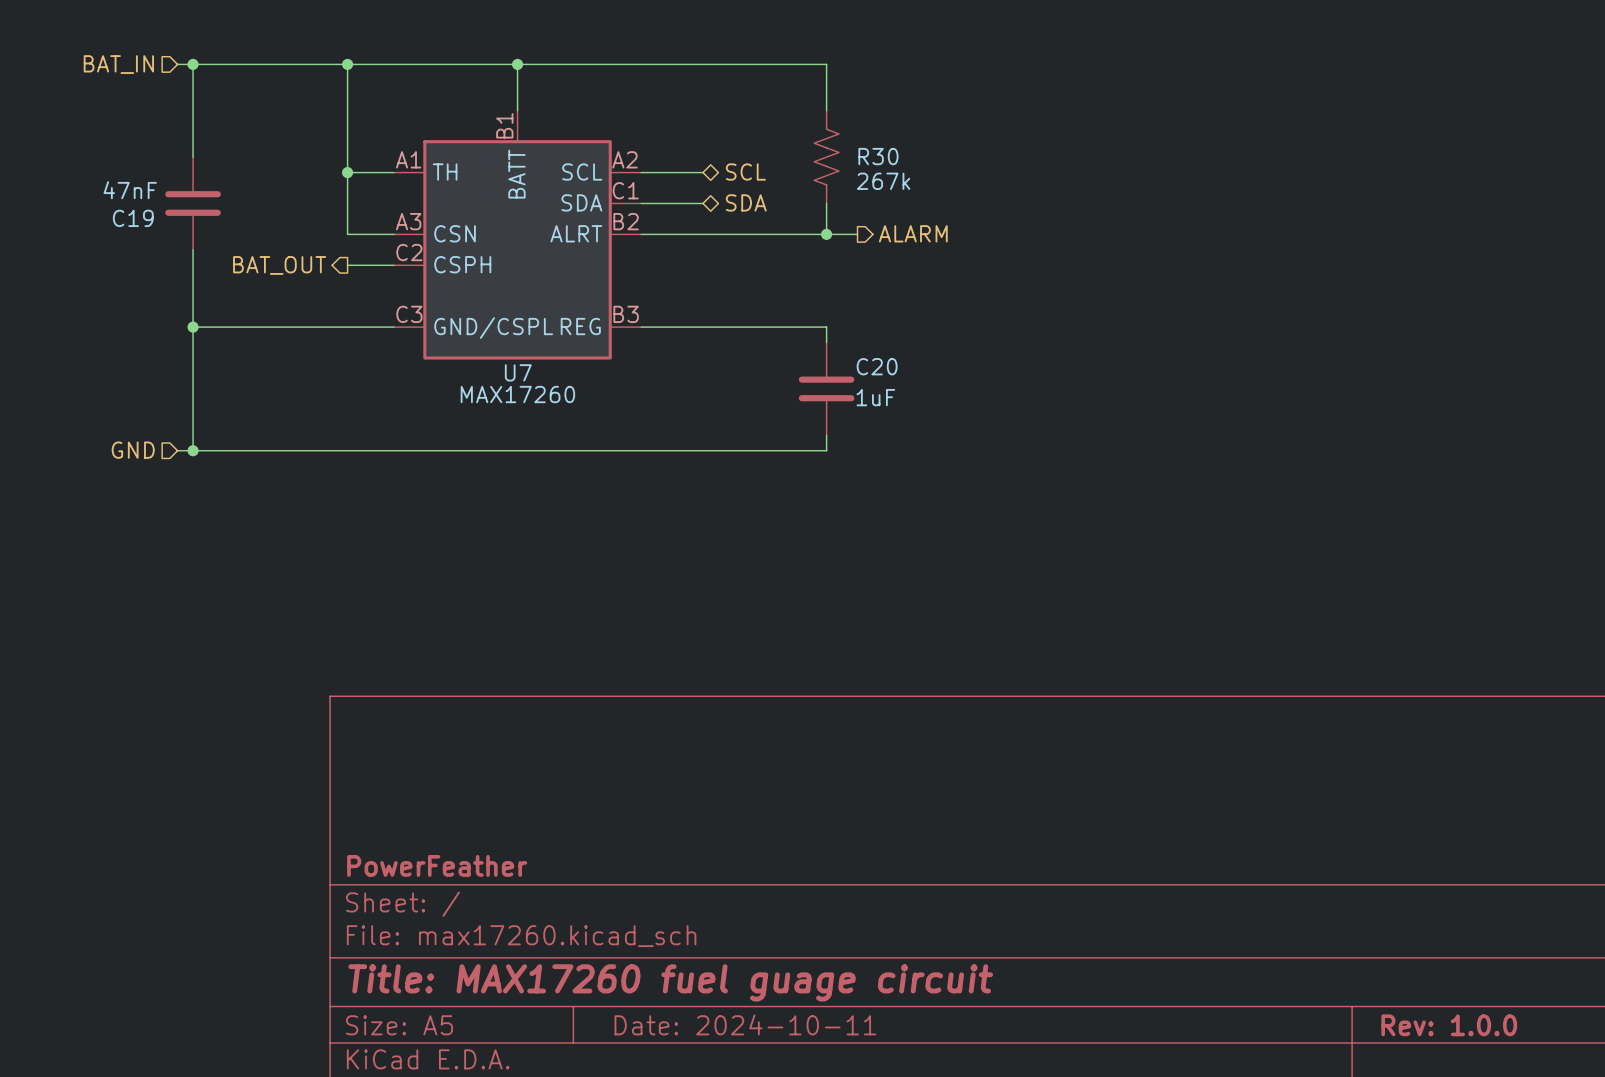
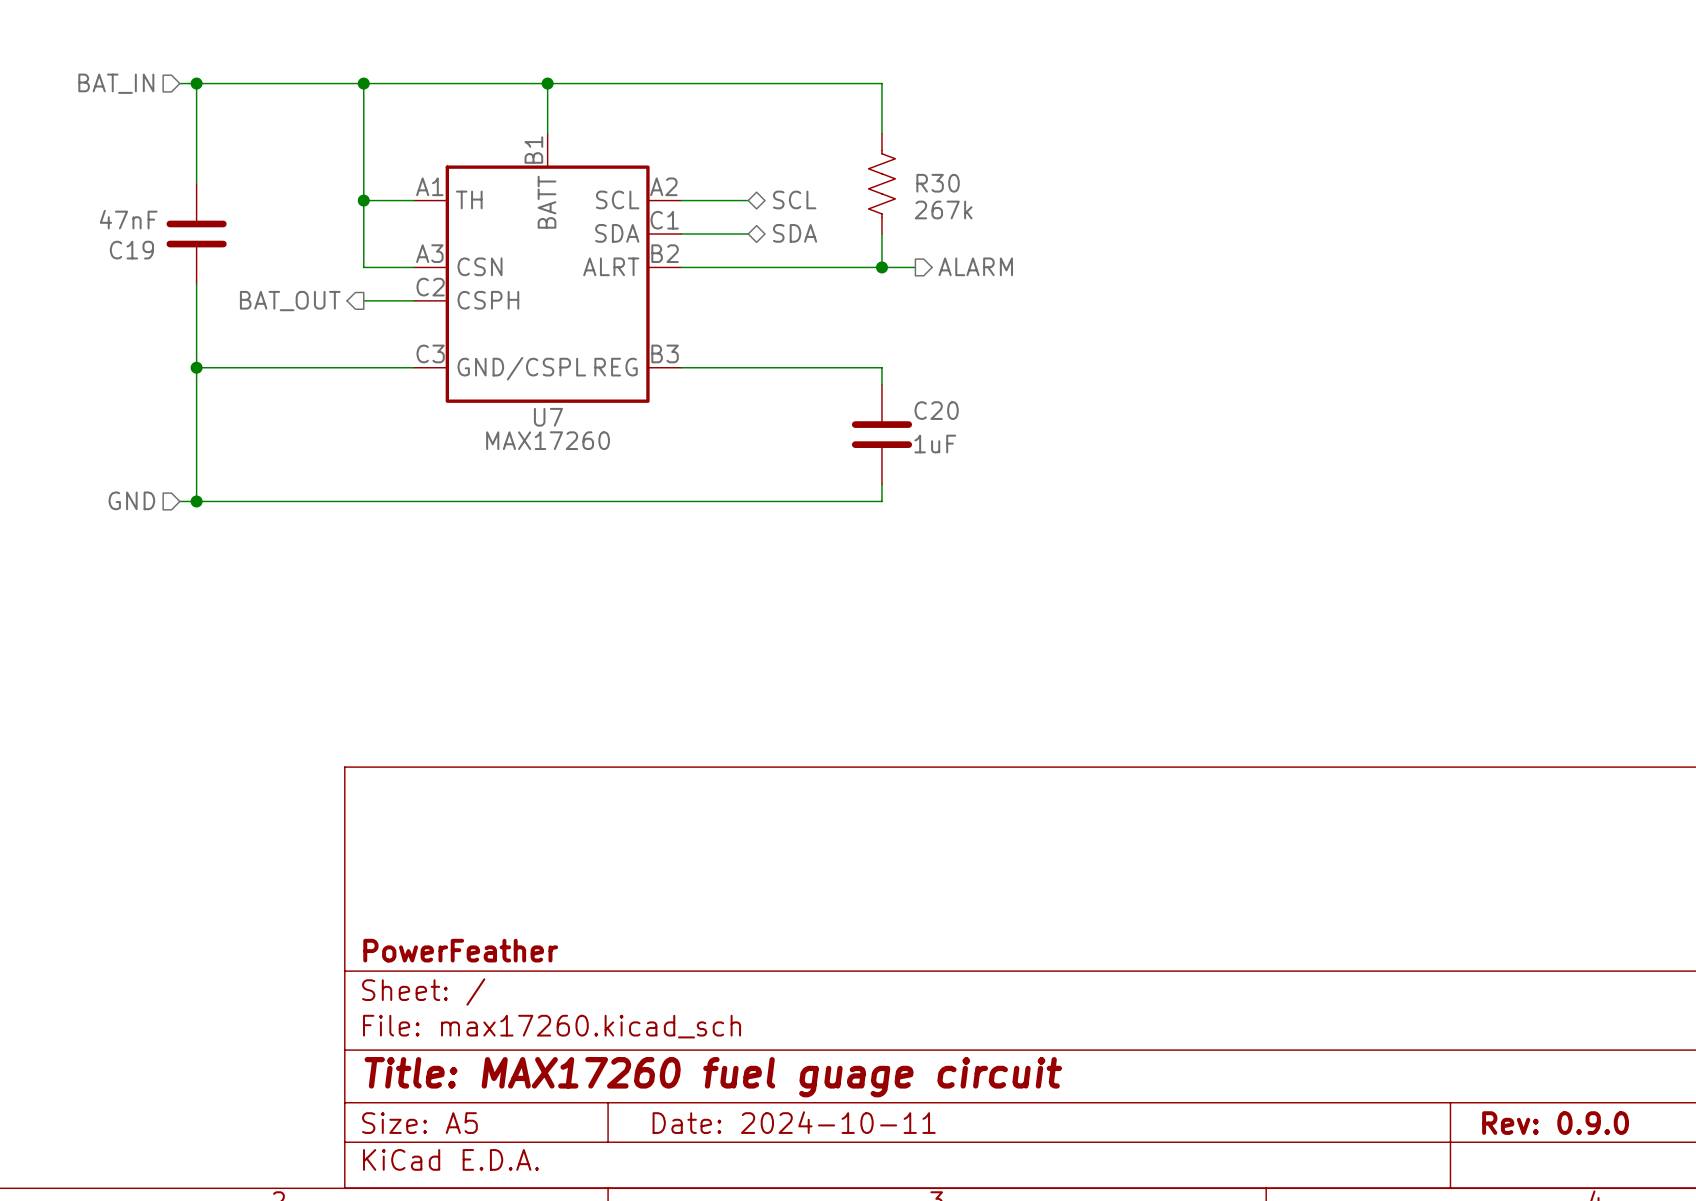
title block: Rev: 1.0.0 (1449, 1025) -> Rev: 0.9.0 (1555, 1123)

